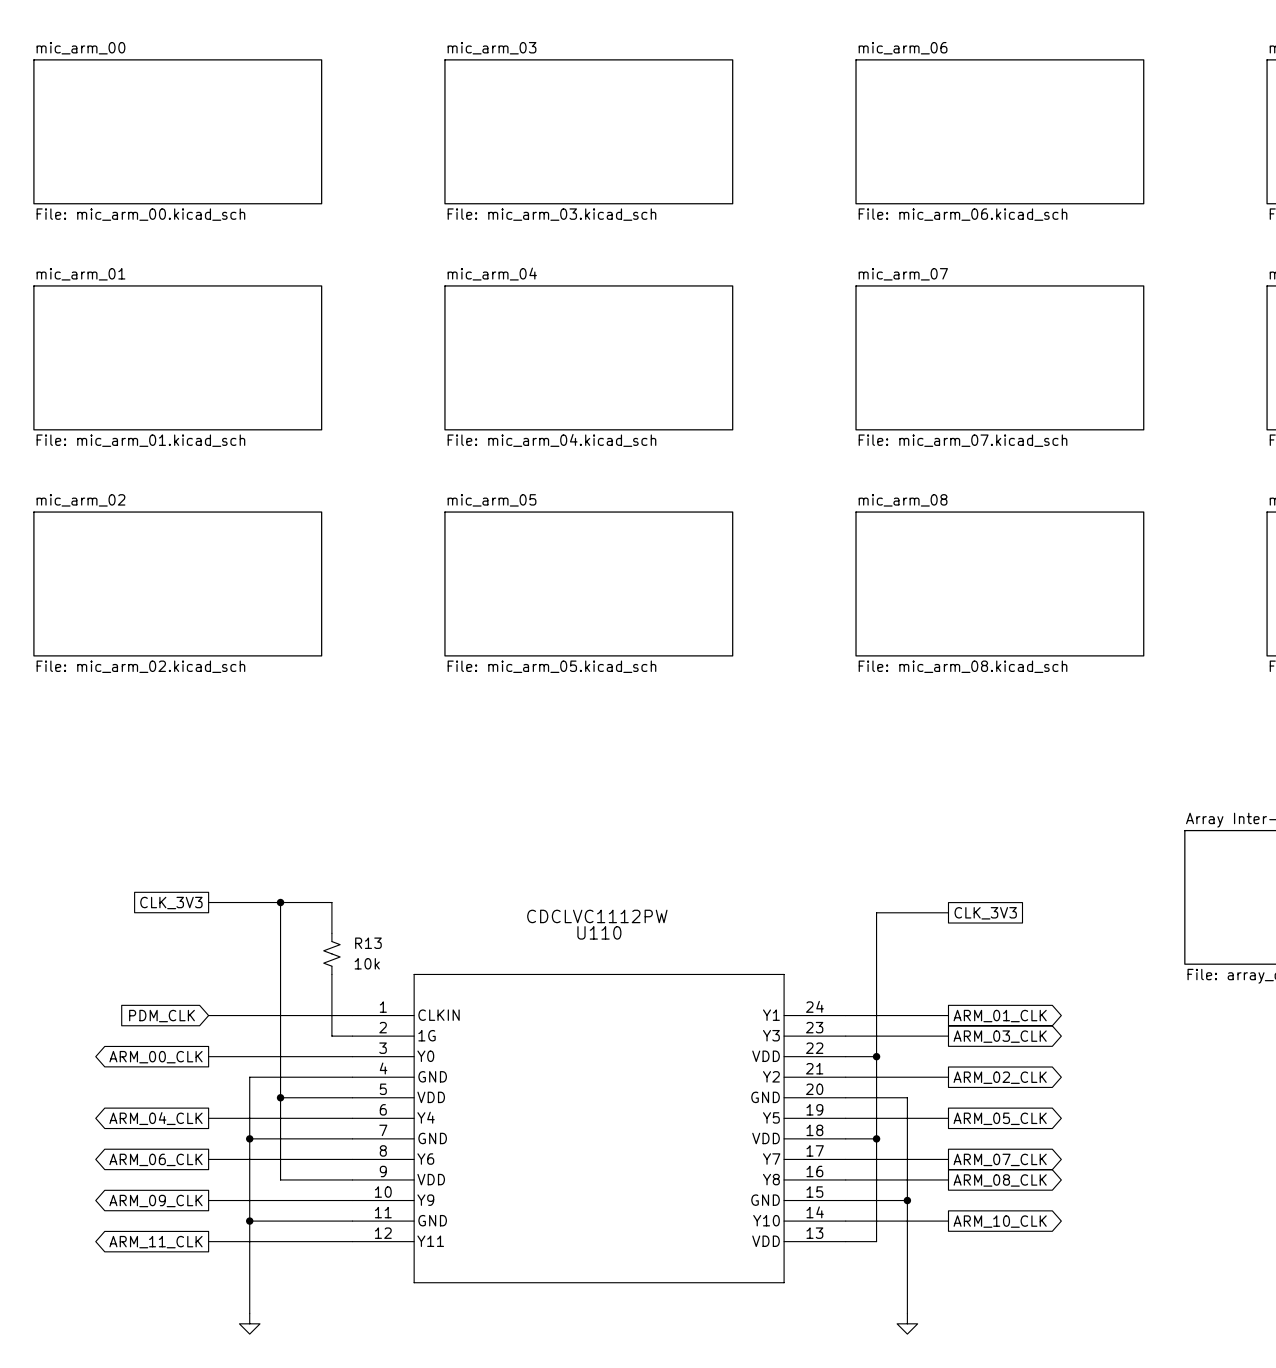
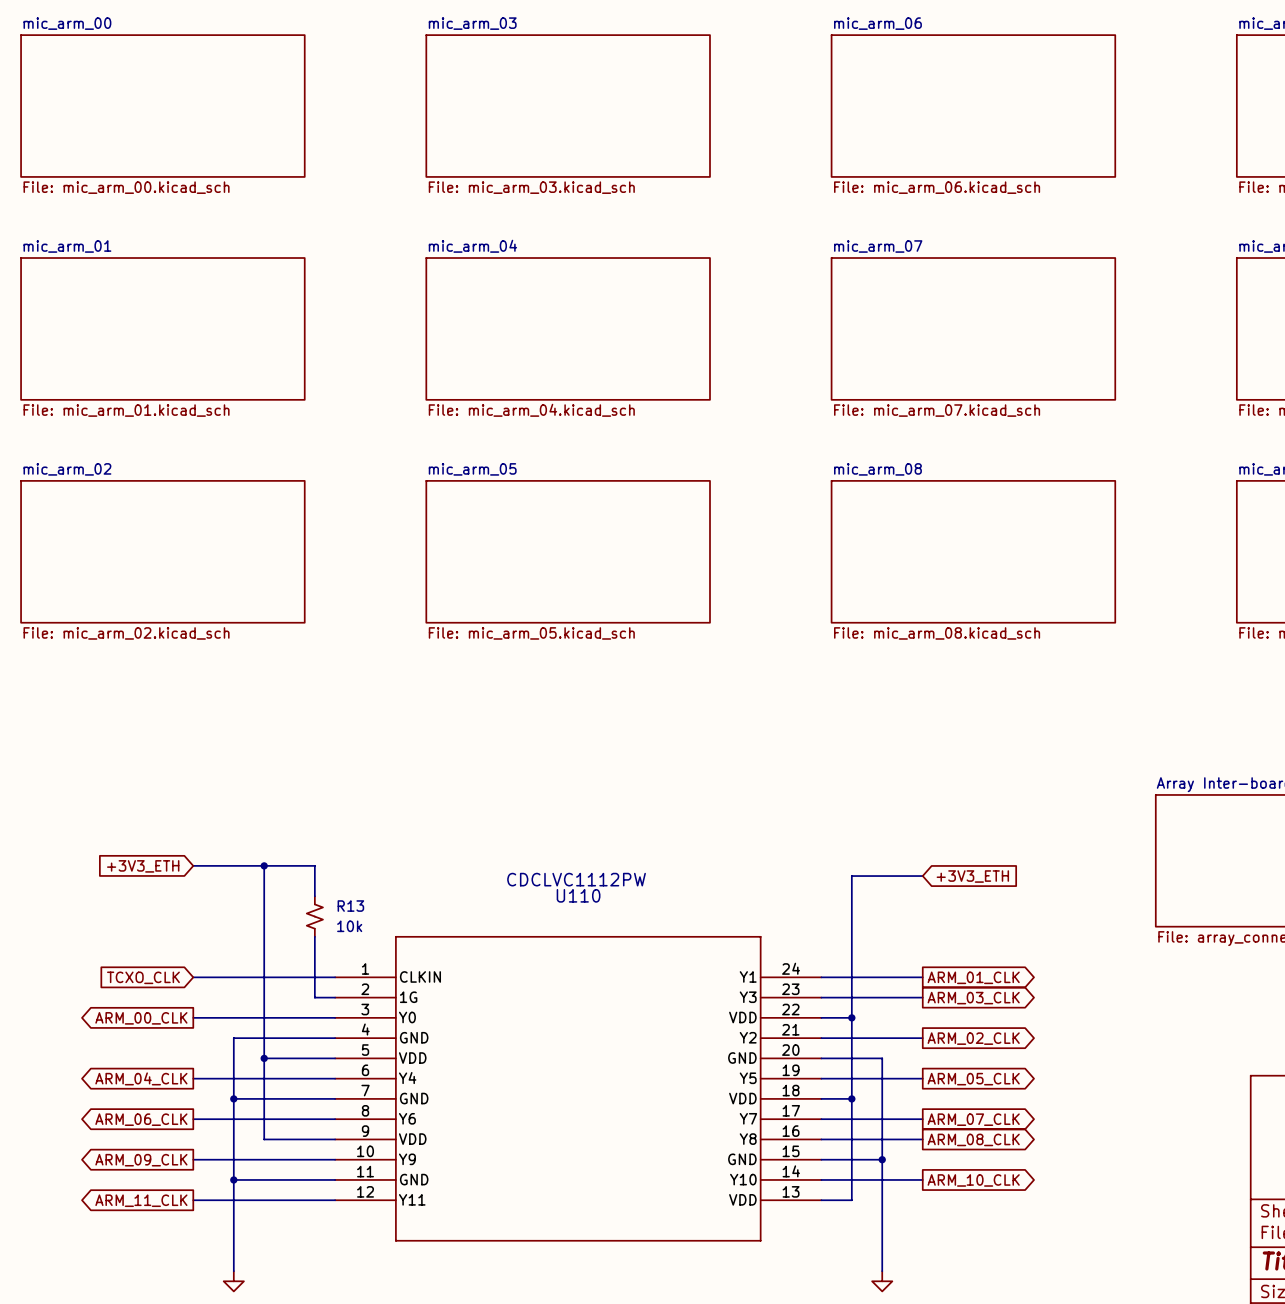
global label shape: passive (171, 903) -> input (143, 866)
global label: CLK_3V3 (171, 903) -> +3V3_ETH (143, 866)
global label shape: passive (985, 913) -> input (972, 876)
global label: CLK_3V3 (985, 913) -> +3V3_ETH (972, 876)
global label: PDM_CLK (161, 1016) -> TCXO_CLK (143, 977)

